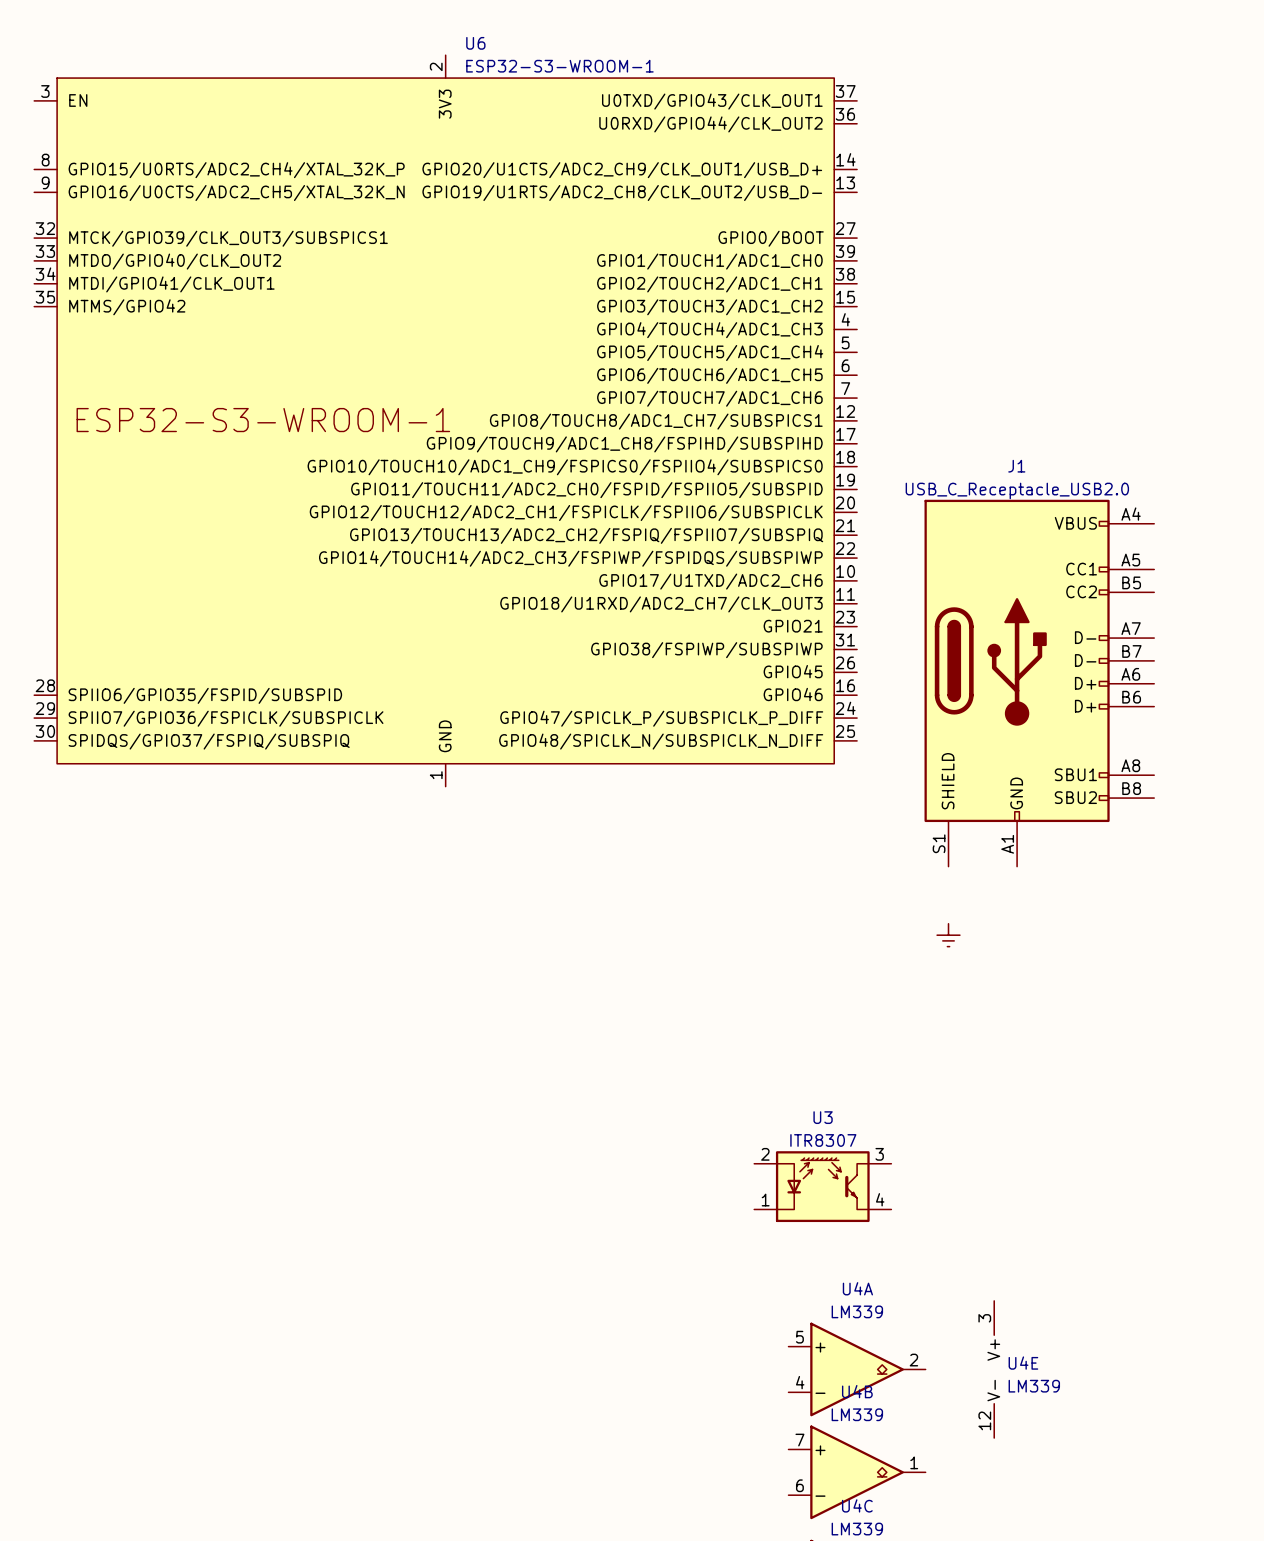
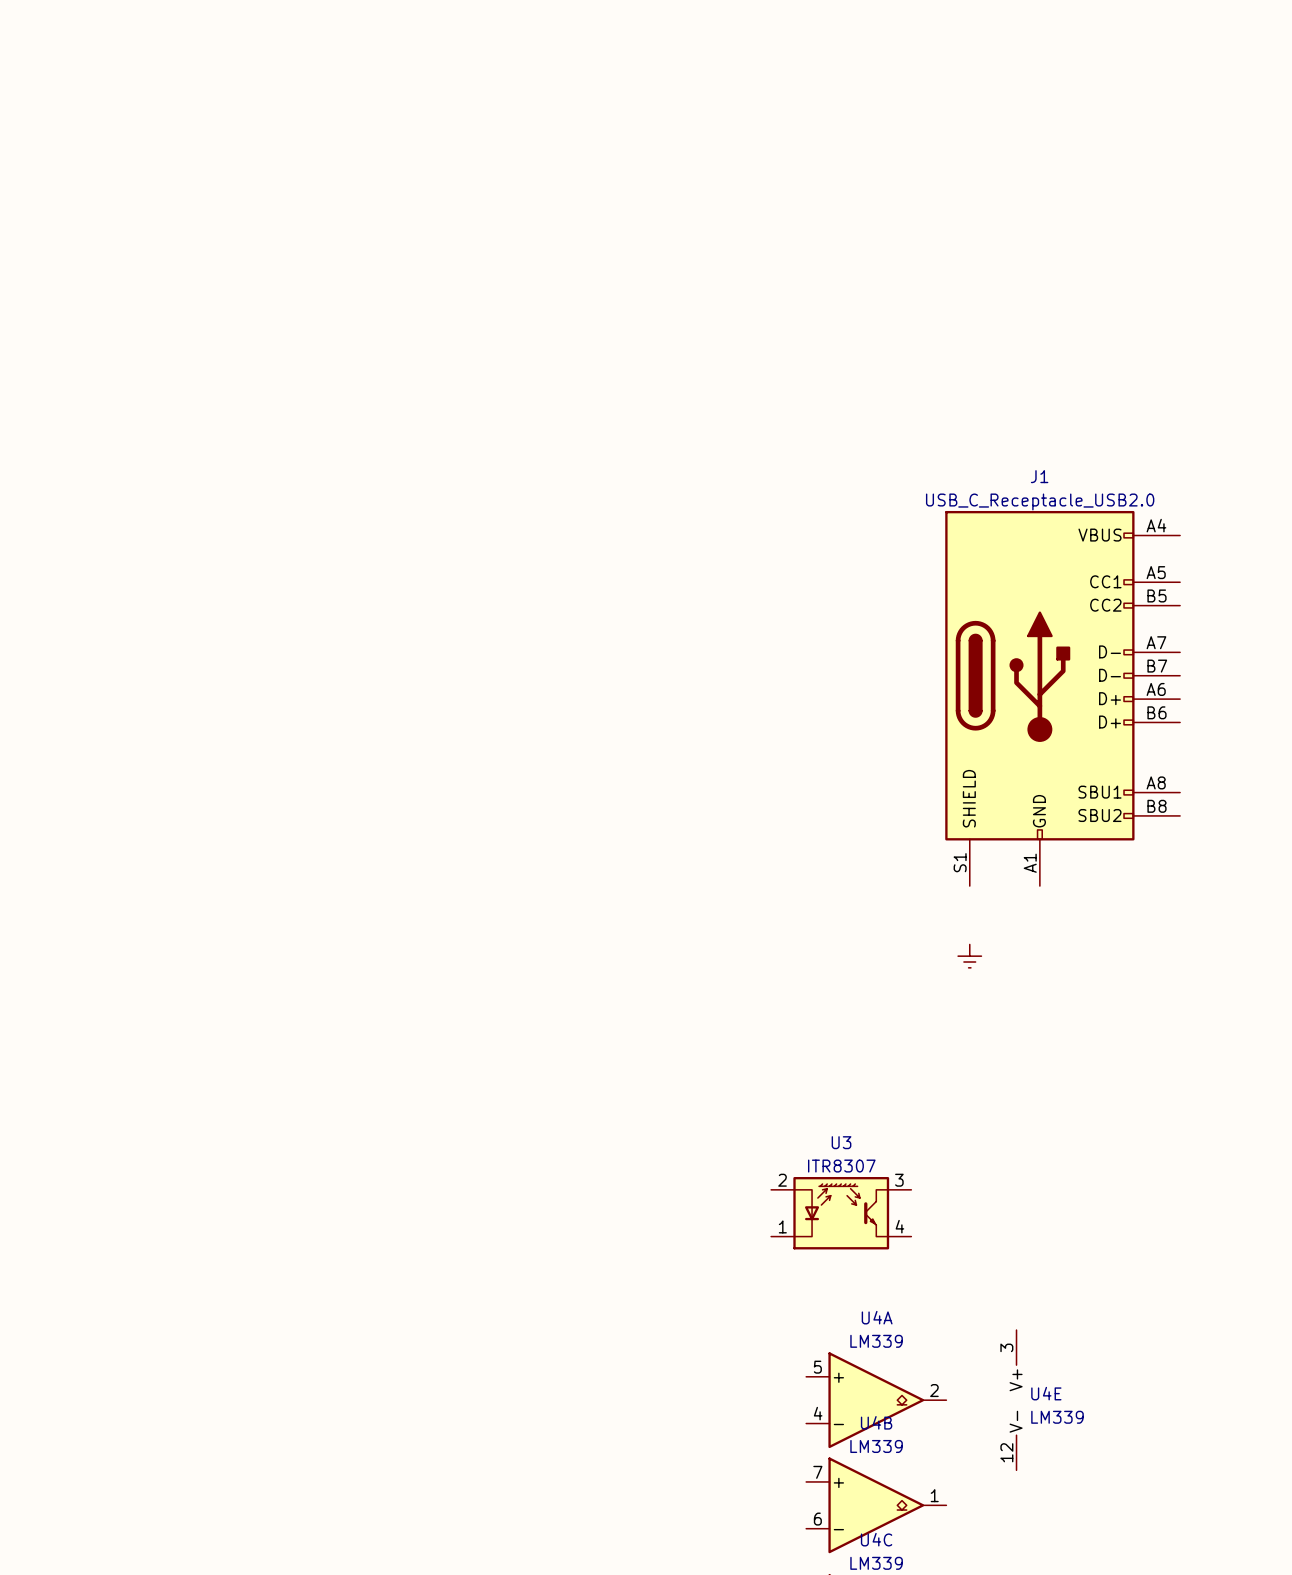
U6: ESP32-S3-WROOM-1 (445, 420) -> none

